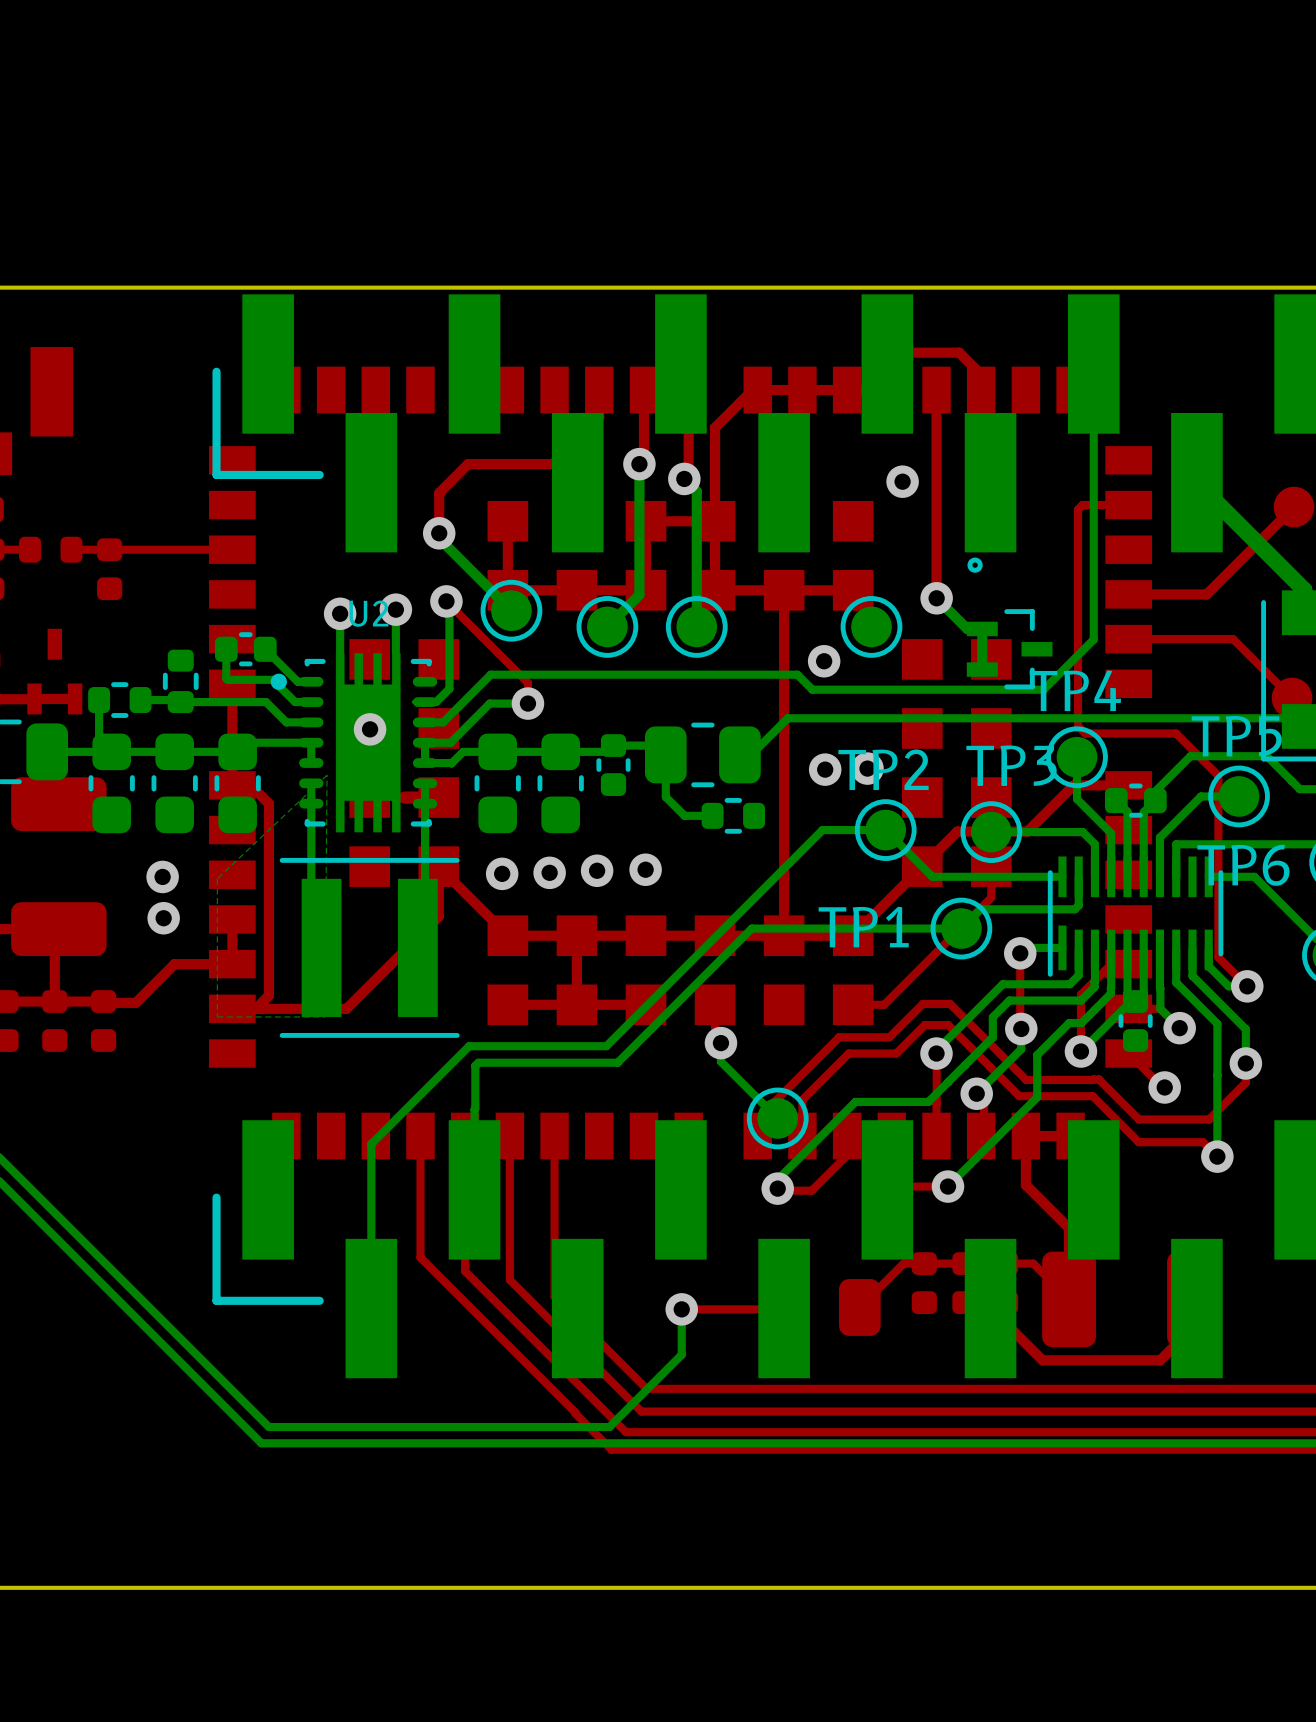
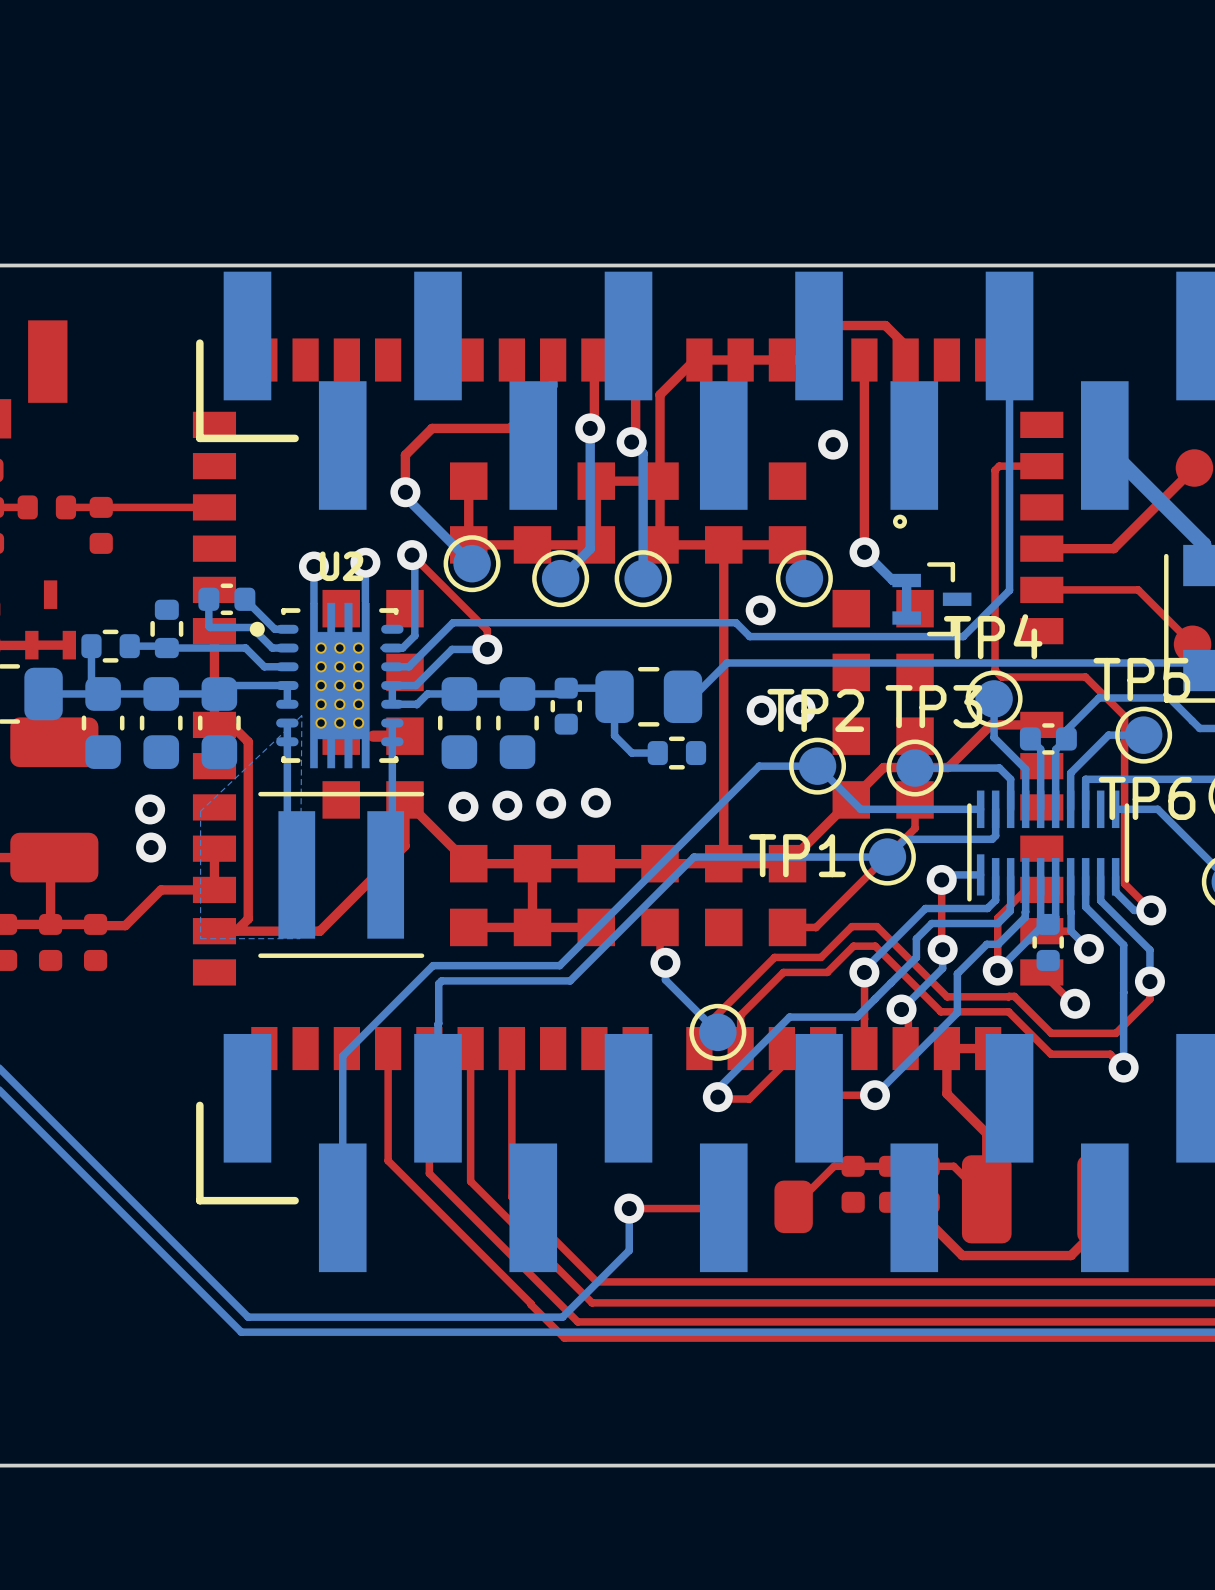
U2 footprint: [270, 653, 438, 833] -> [249, 602, 404, 769]
via: (370, 729) -> none

